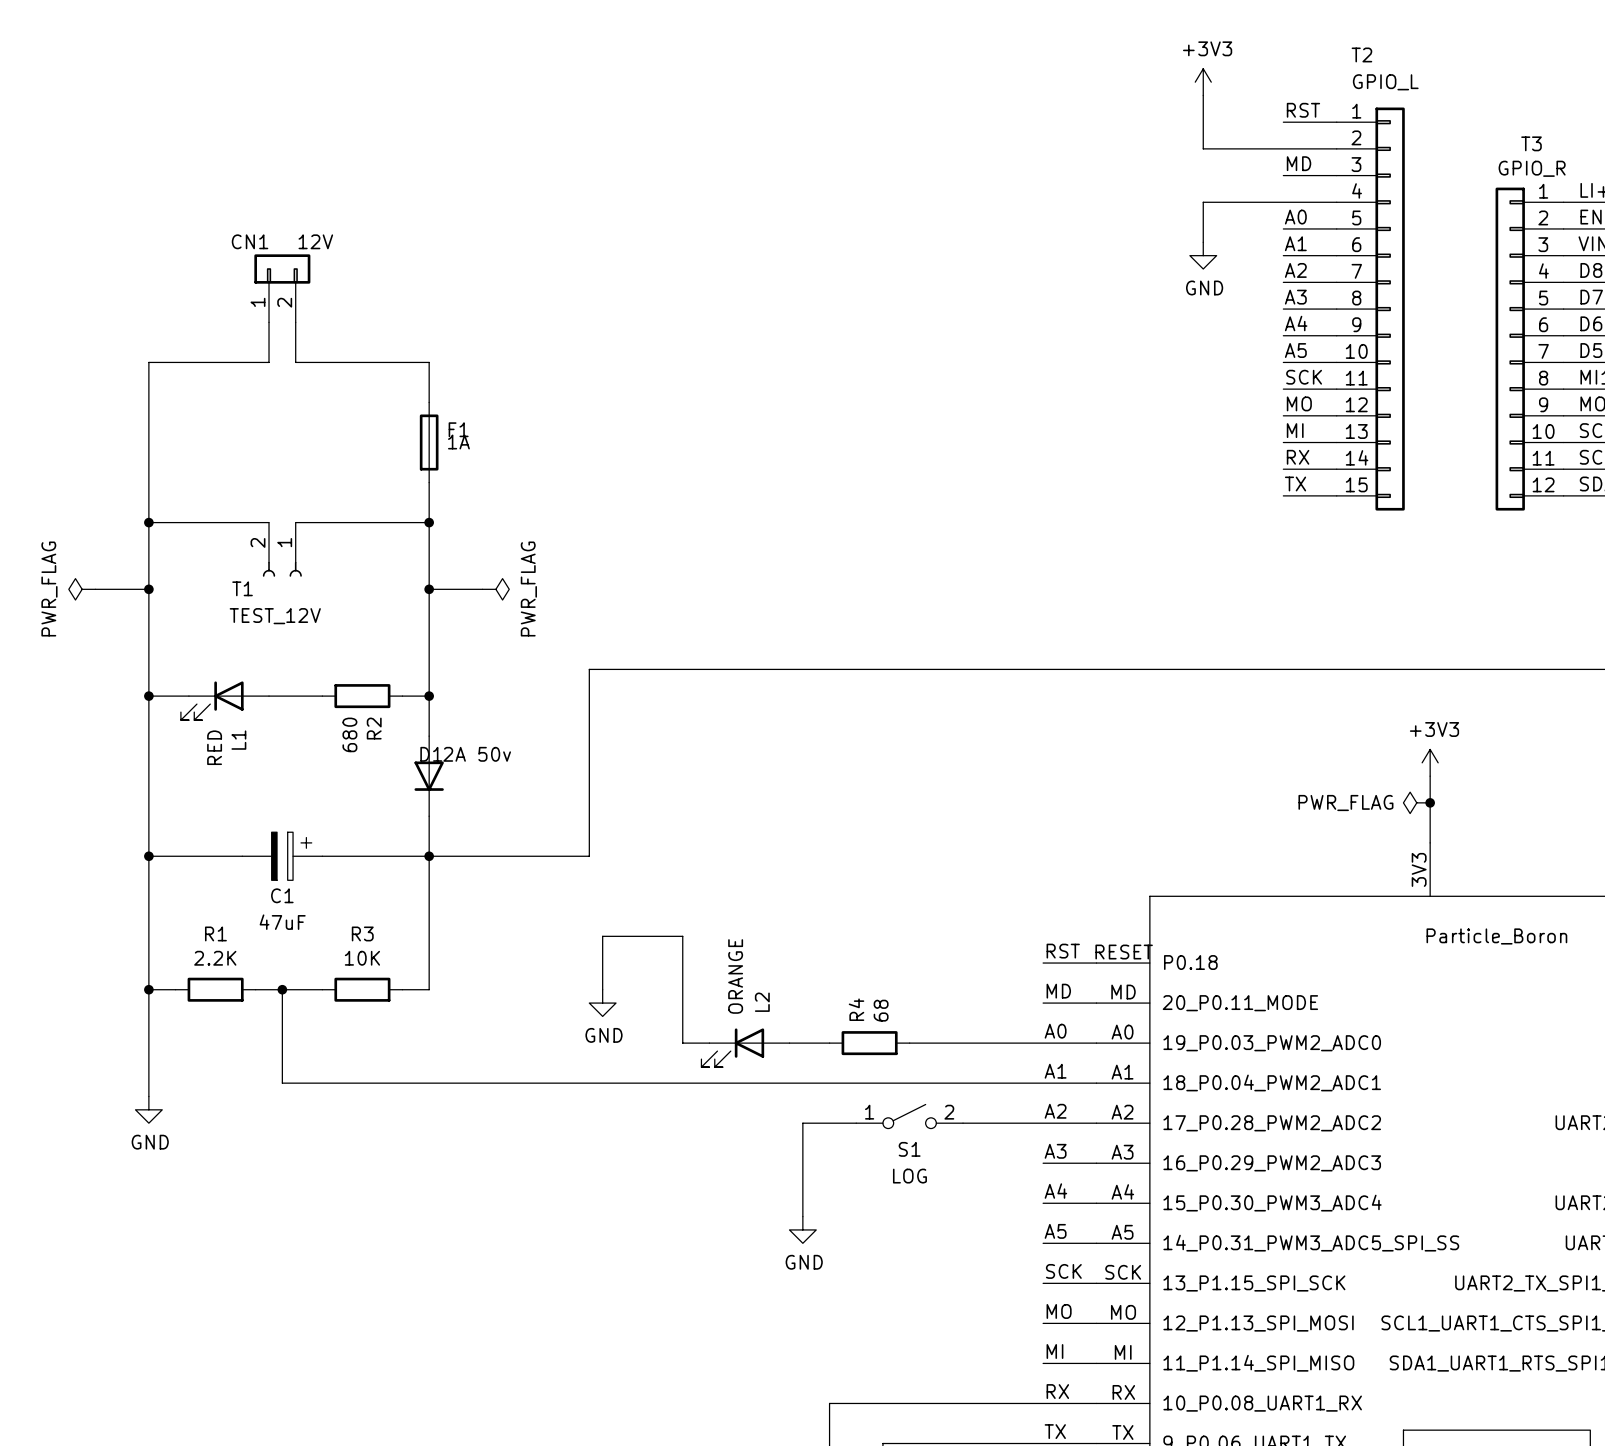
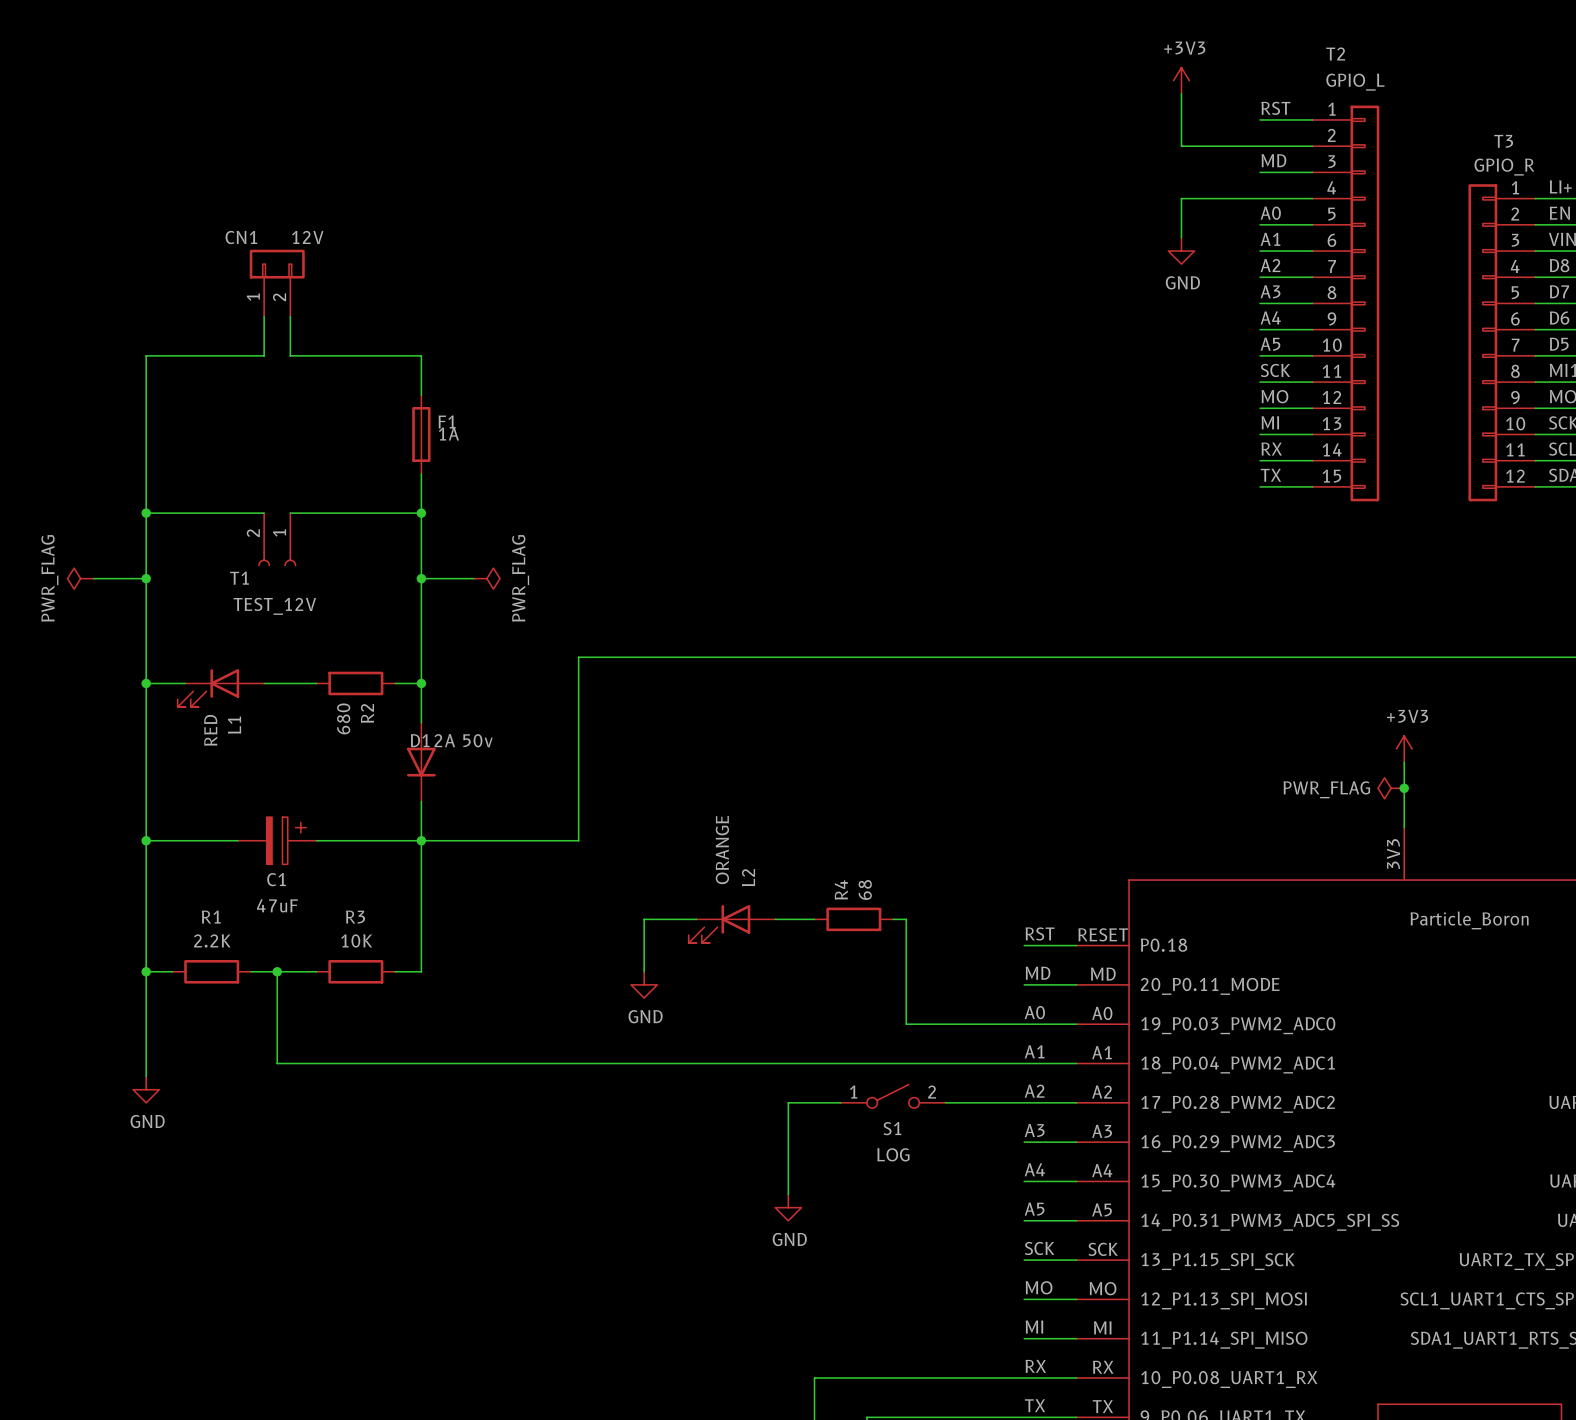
wire: (656, 936) (602, 936) (602, 989) -> (644, 919) (644, 971)
wire: (682, 936) (682, 1043) (709, 1043) -> (670, 919) (696, 919)
power symbol position: GND (602, 1003) -> GND (644, 984)
wire: (789, 1043) (829, 1043) -> (775, 919) (814, 919)
R4 position: (869, 1043) -> (853, 919)
wire: (909, 1043) (922, 1043) -> (893, 919) (906, 919) (906, 1024)
L2 position: (745, 1047) -> (731, 923)

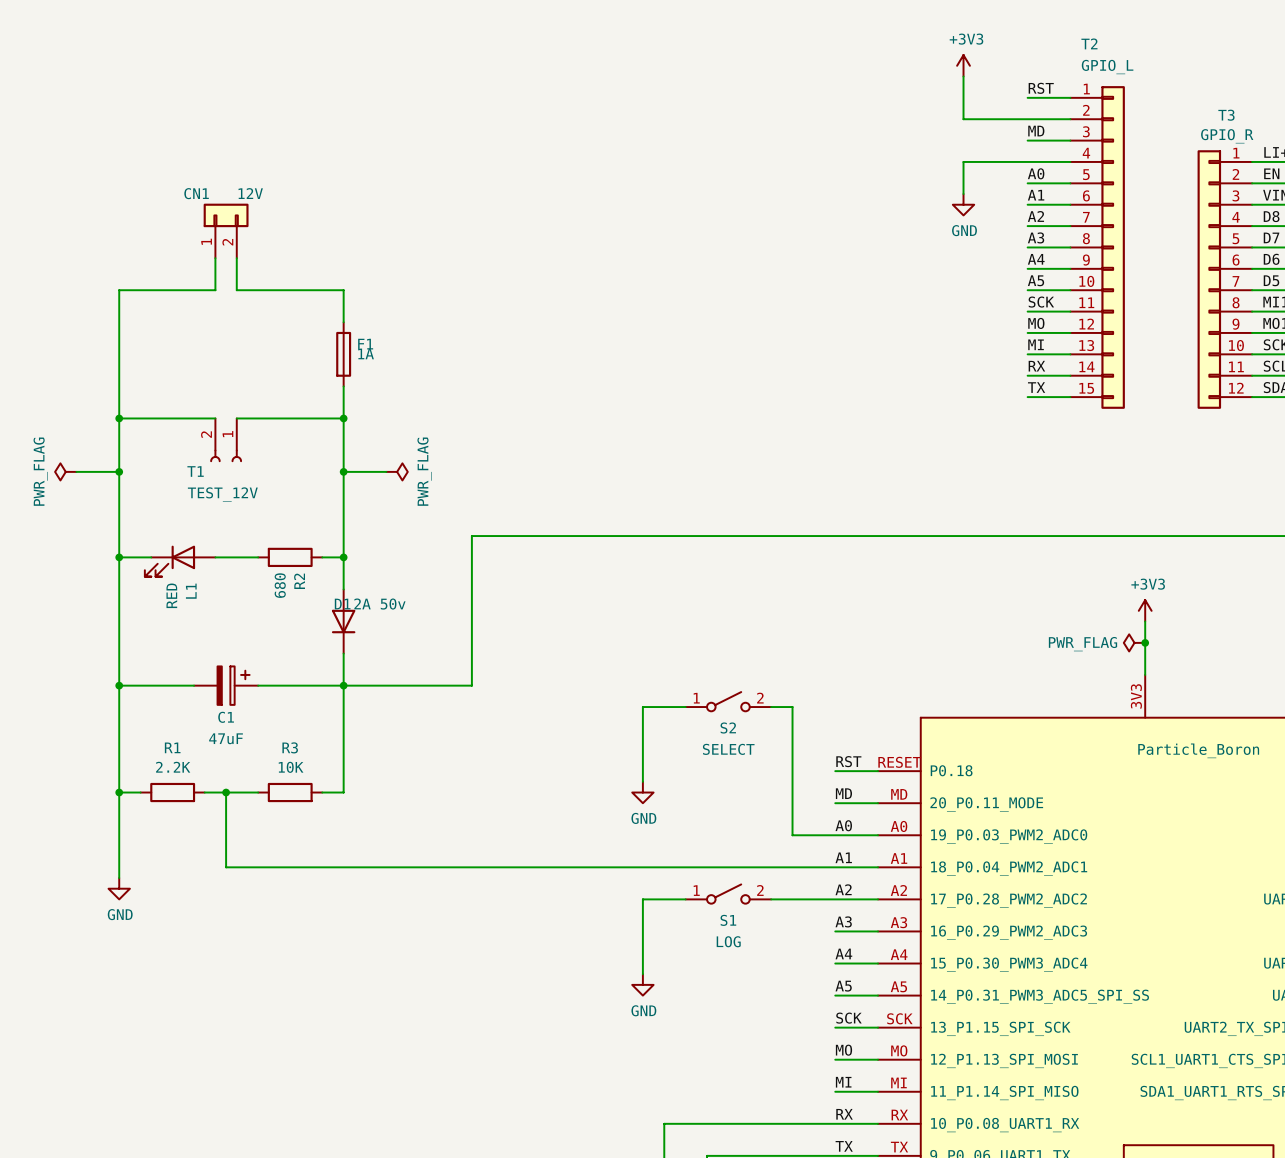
S2: none -> SELECT (728, 701)
wire: none -> (685, 707) (642, 707) (642, 781)
wire: (696, 919) (644, 919) (644, 971) -> none
wire: (775, 919) (814, 919) -> none
R4: 68 (853, 919) -> none
wire: (893, 919) (906, 919) (906, 1024) (971, 1024) -> (771, 707) (792, 707) (792, 835)
L2: ORANGE (731, 923) -> none
power symbol position: GND (644, 984) -> GND (642, 792)

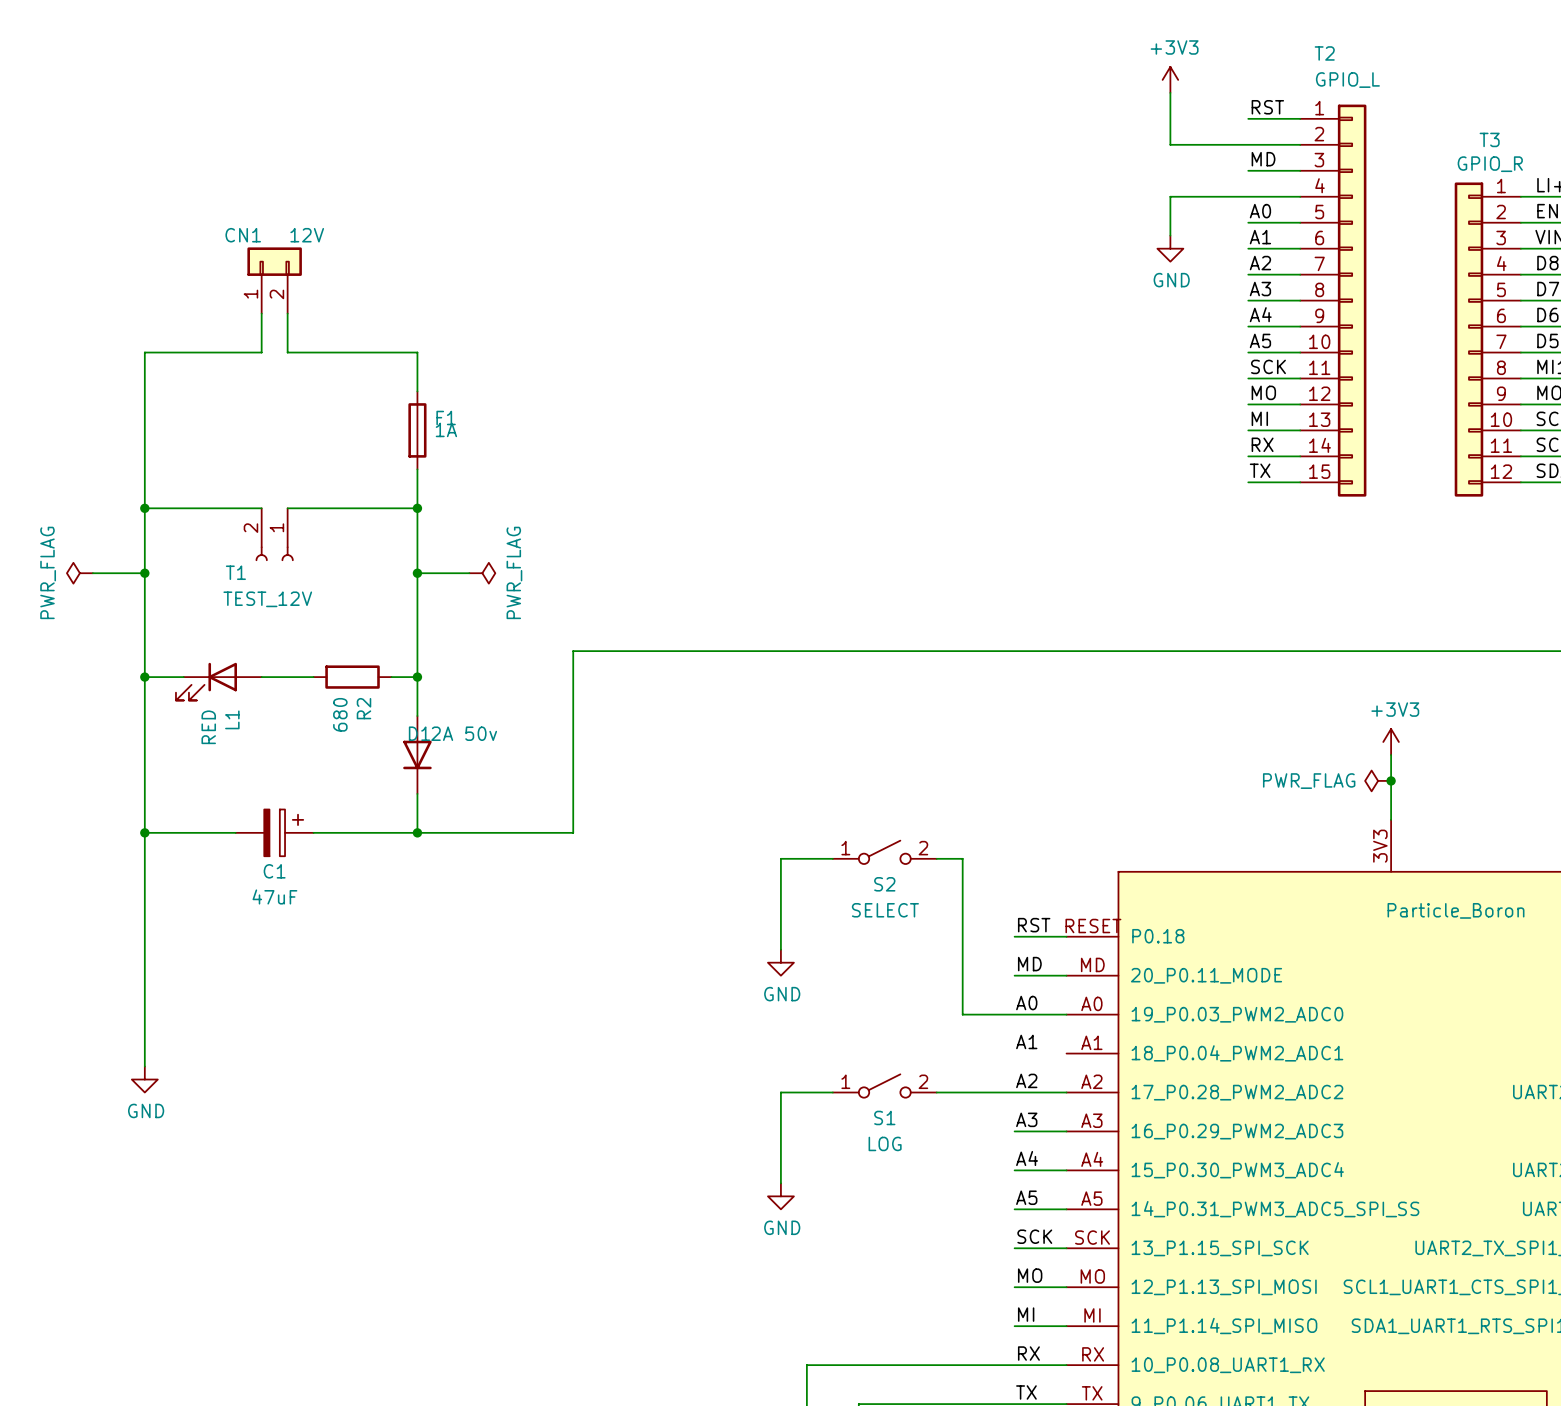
wire: (343, 685) (343, 792) (322, 792) -> none
wire: (119, 792) (140, 792) -> none
junction: (119, 792) -> none
R1: 2.2K (172, 792) -> none
wire: (204, 792) (258, 792) -> none
wire: (226, 792) (226, 867) (878, 867) -> none
junction: (226, 792) -> none
R3: 10K (290, 792) -> none

